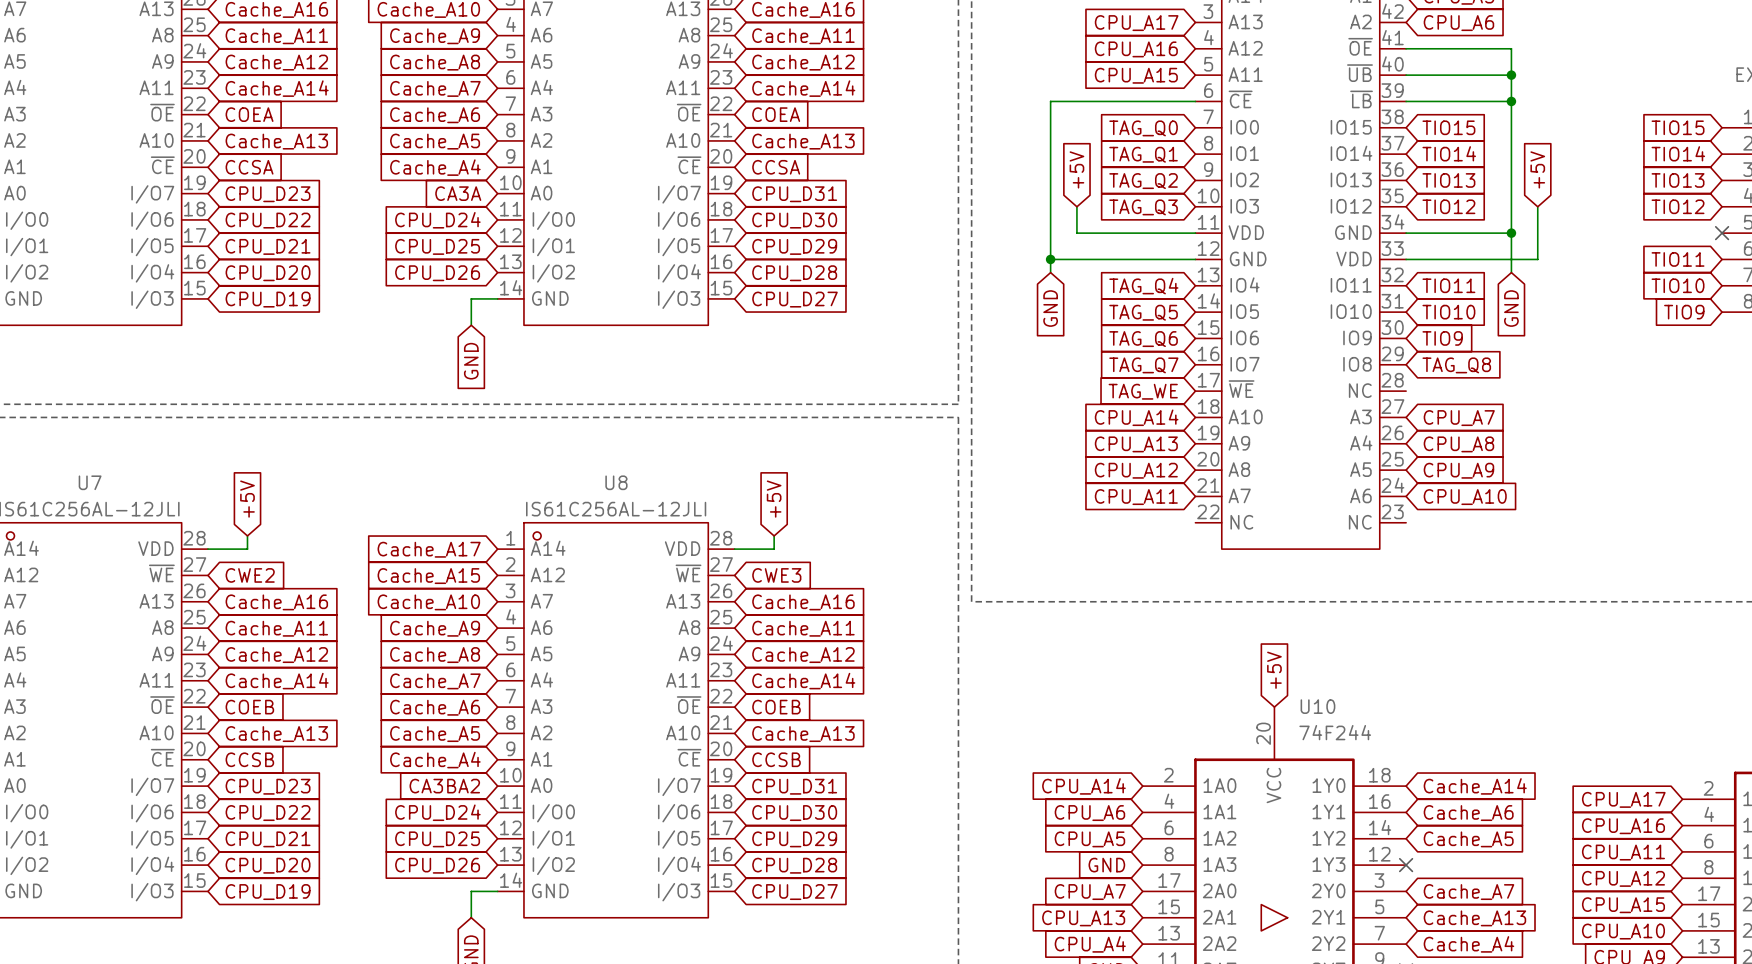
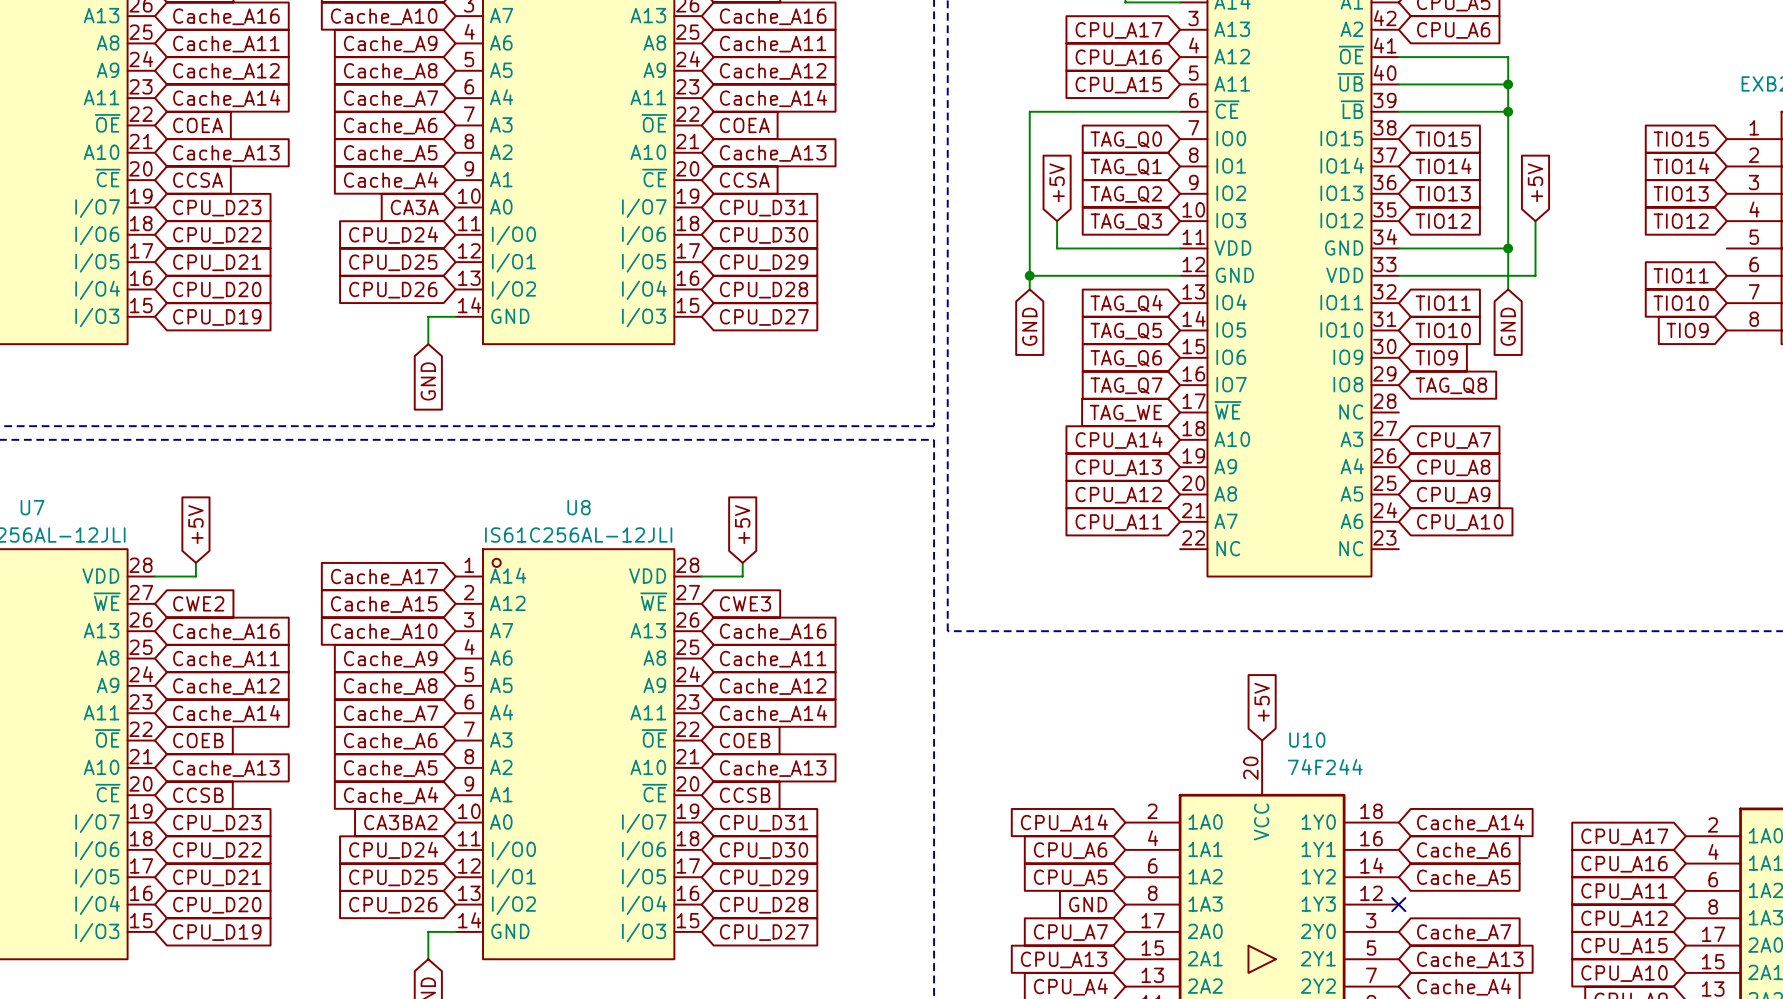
no-connect mark: (1722, 233) -> none

